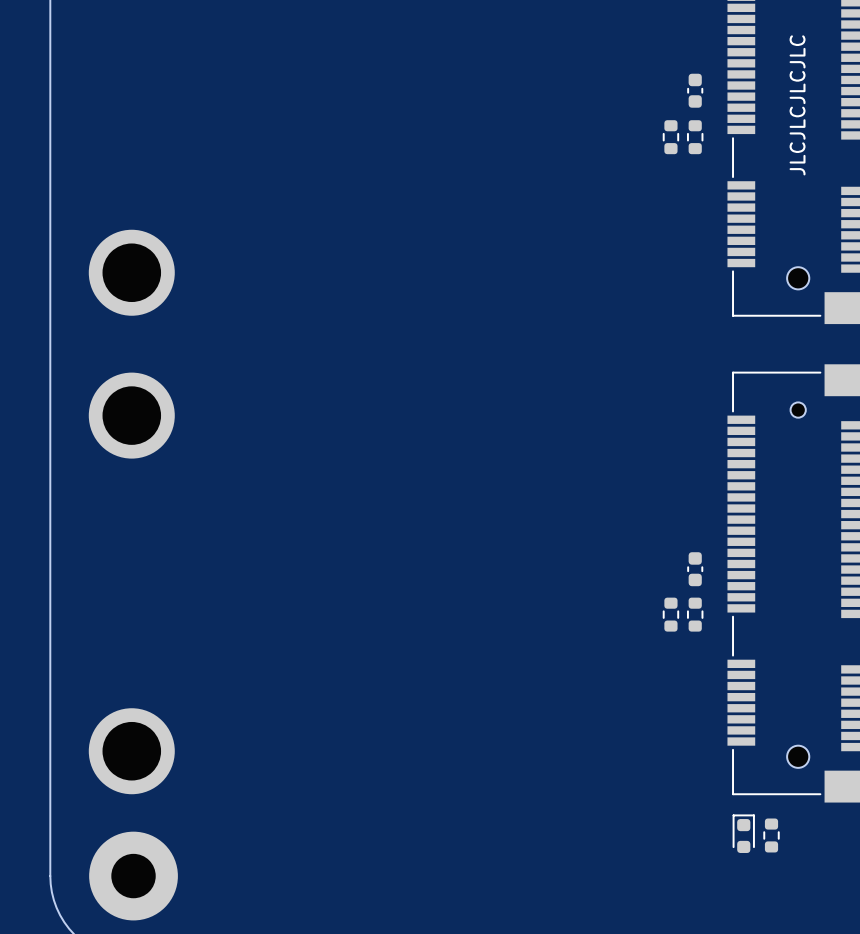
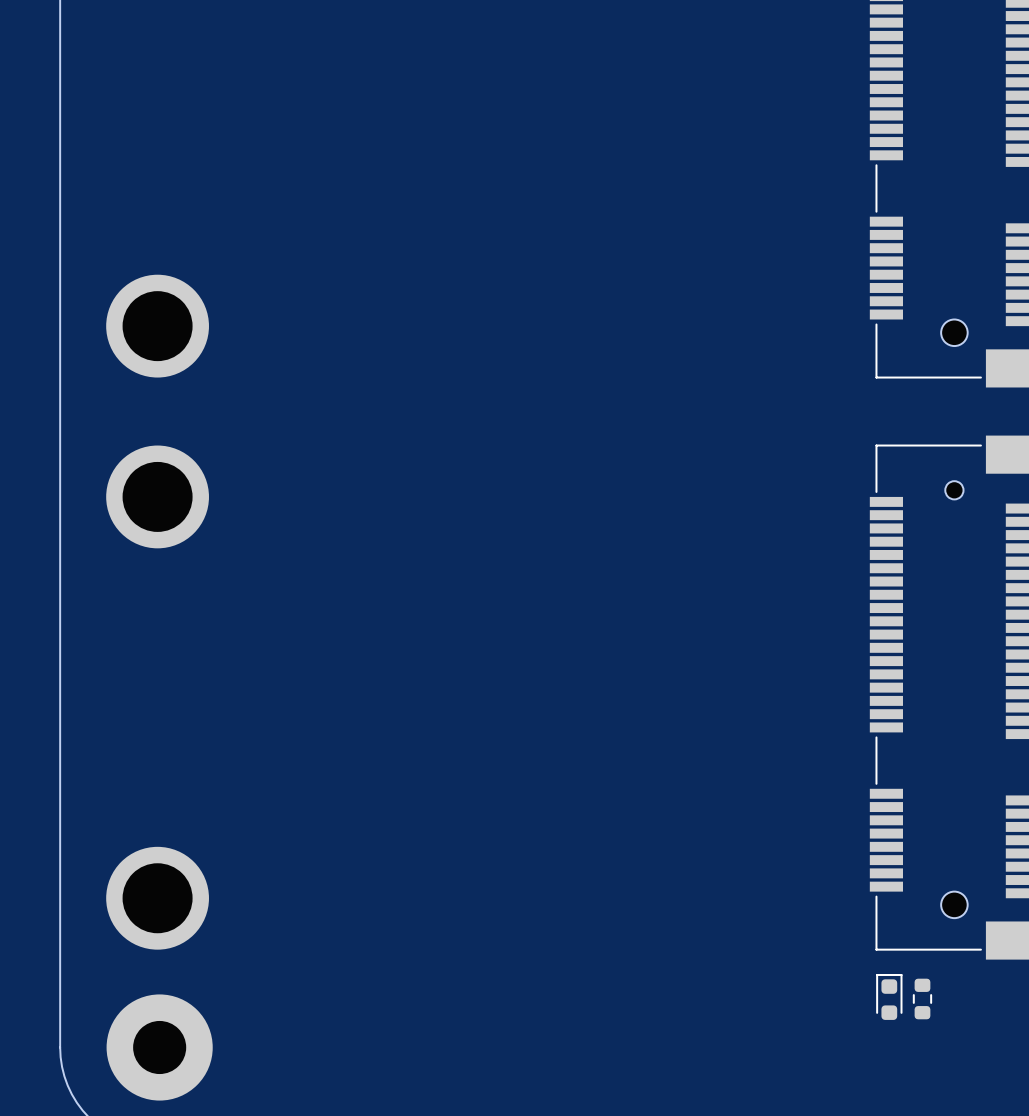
part: (695, 90) -> none
text: JLCJLCJLCJLC (797, 105) -> none
part: (670, 137) -> none
part: (695, 137) -> none
part: (695, 569) -> none
part: (670, 614) -> none
part: (695, 614) -> none

